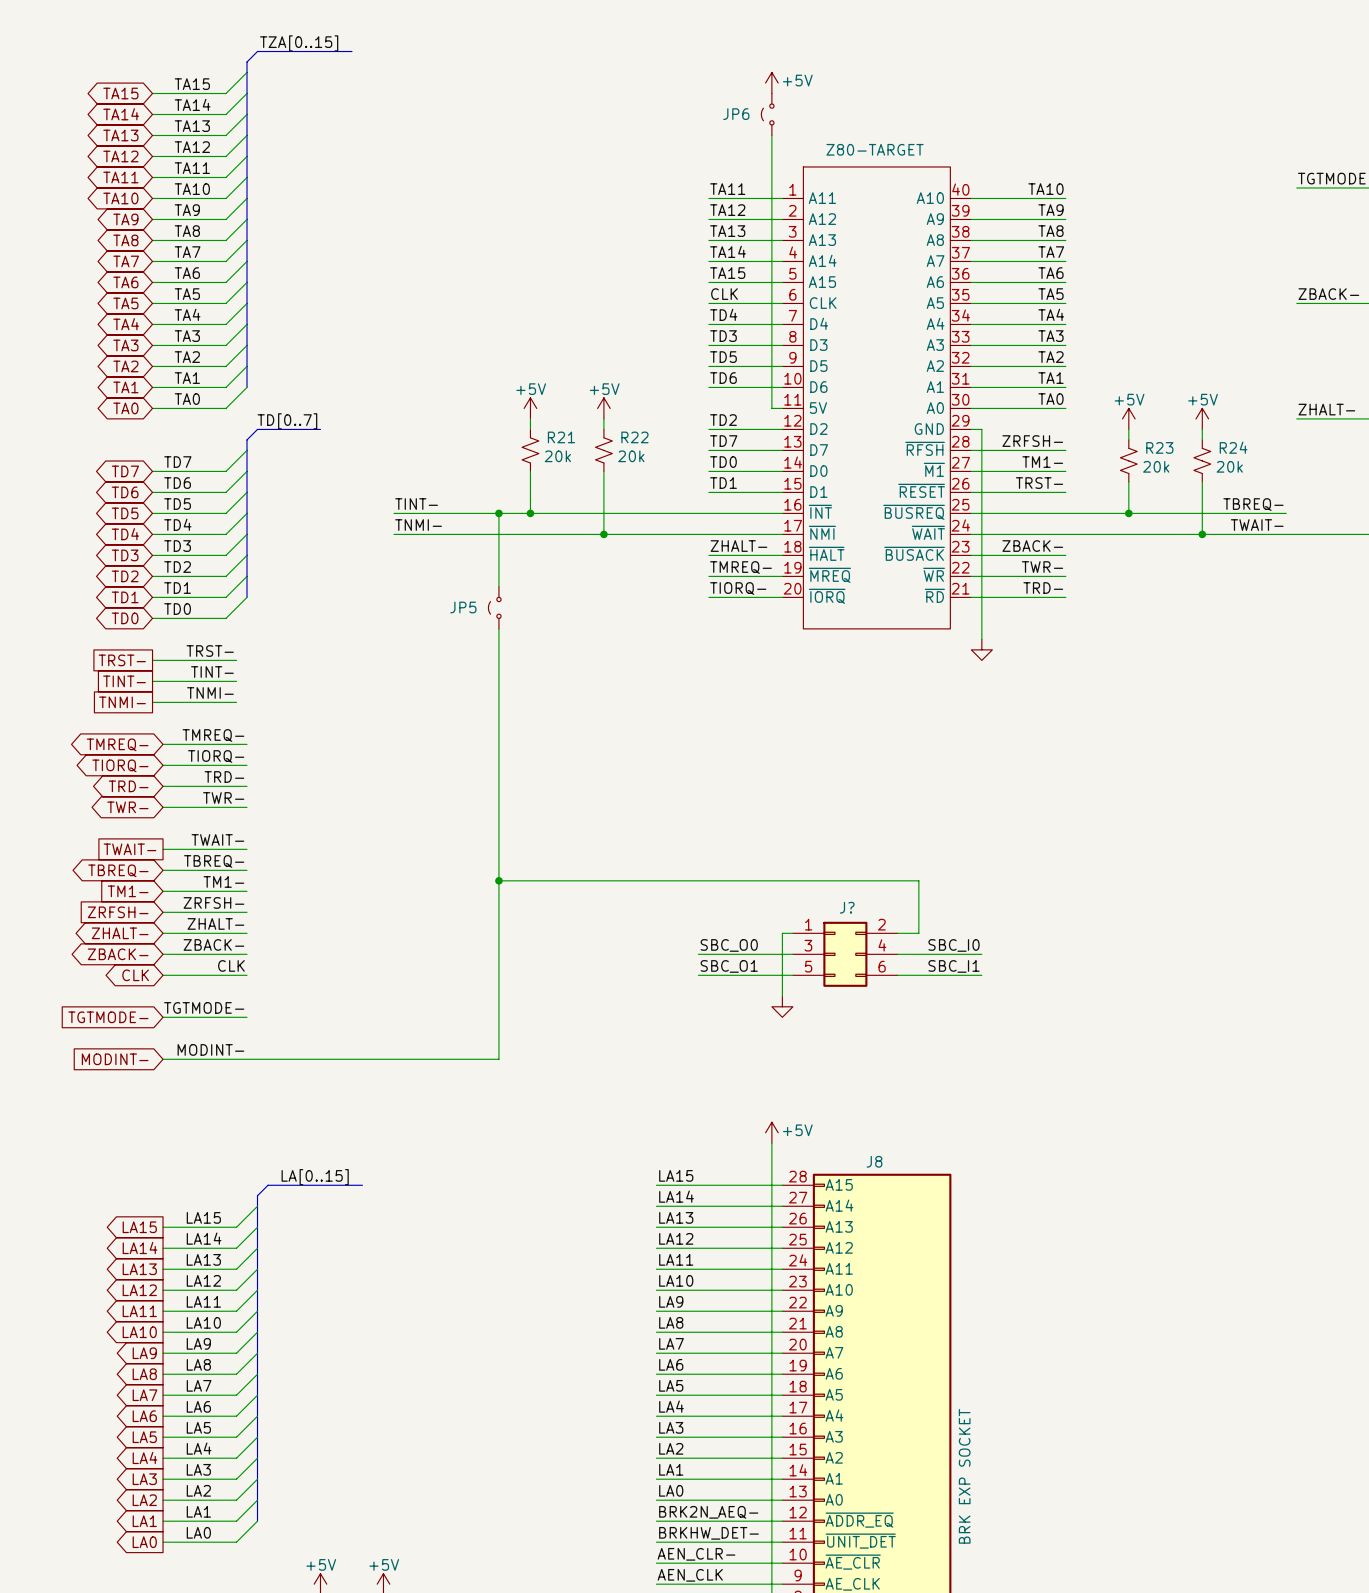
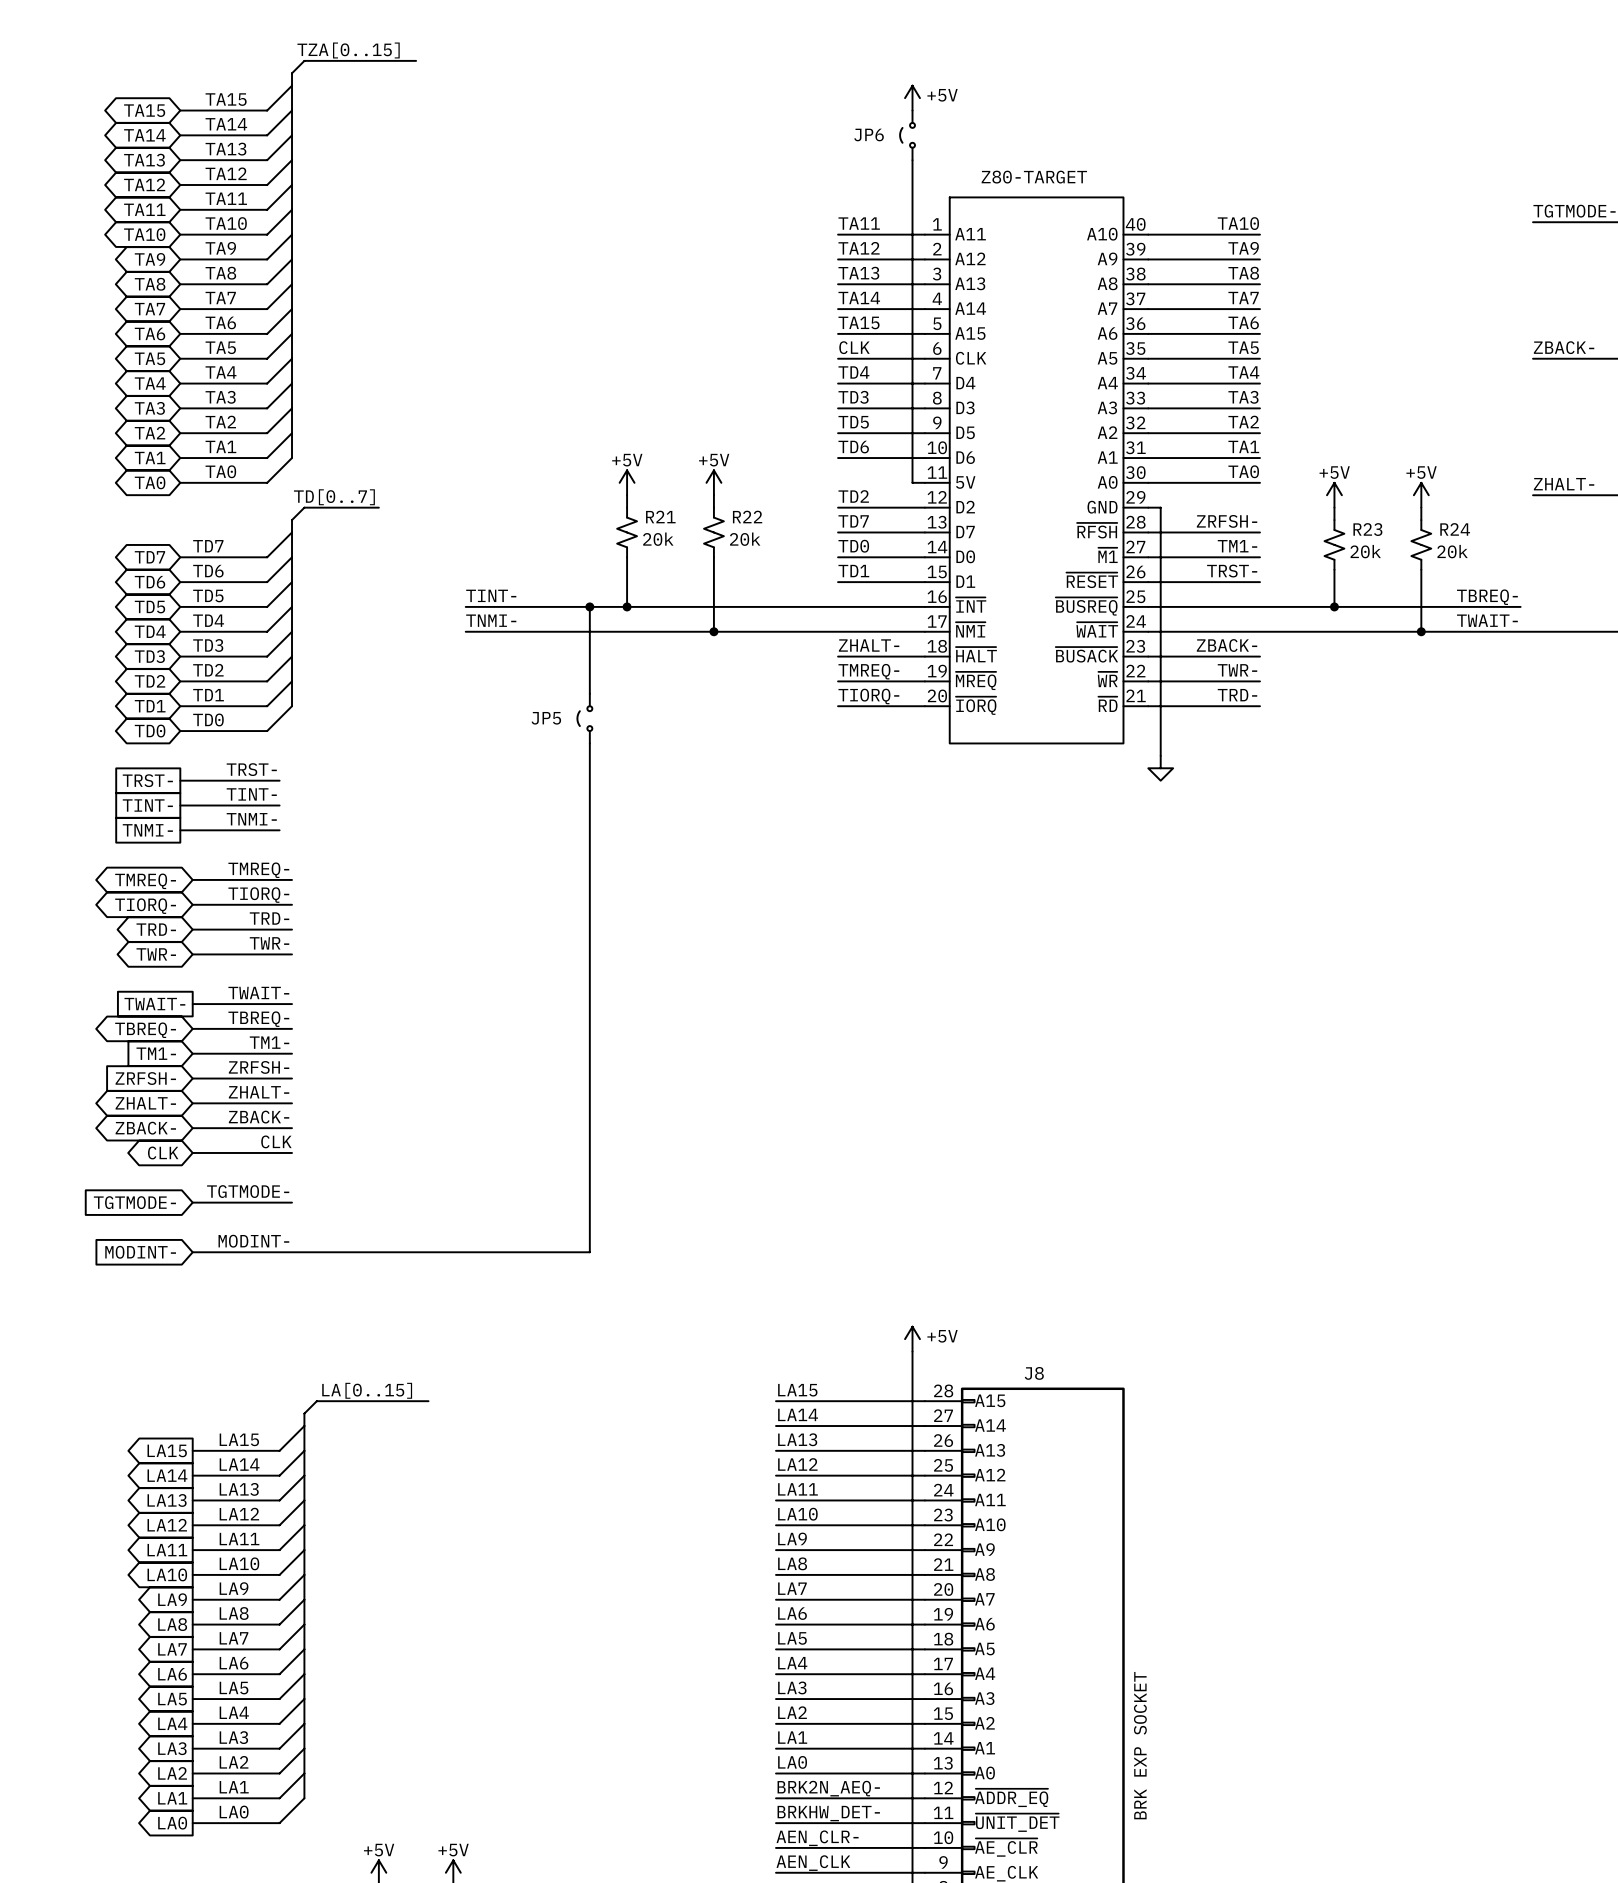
wire: (498, 880) (918, 880) (918, 933) (897, 933) -> none
junction: (498, 880) -> none
wire: (792, 933) (782, 933) (782, 996) -> none
label: SBC_O0 (729, 945) -> none
label: SBC_I0 (954, 945) -> none
wire: (698, 954) (792, 954) -> none
J?: (845, 954) -> none
wire: (897, 954) (981, 954) -> none
label: SBC_O1 (729, 966) -> none
label: SBC_I1 (954, 966) -> none
wire: (698, 975) (792, 975) -> none
wire: (897, 975) (981, 975) -> none
power symbol: (782, 1006) -> none

